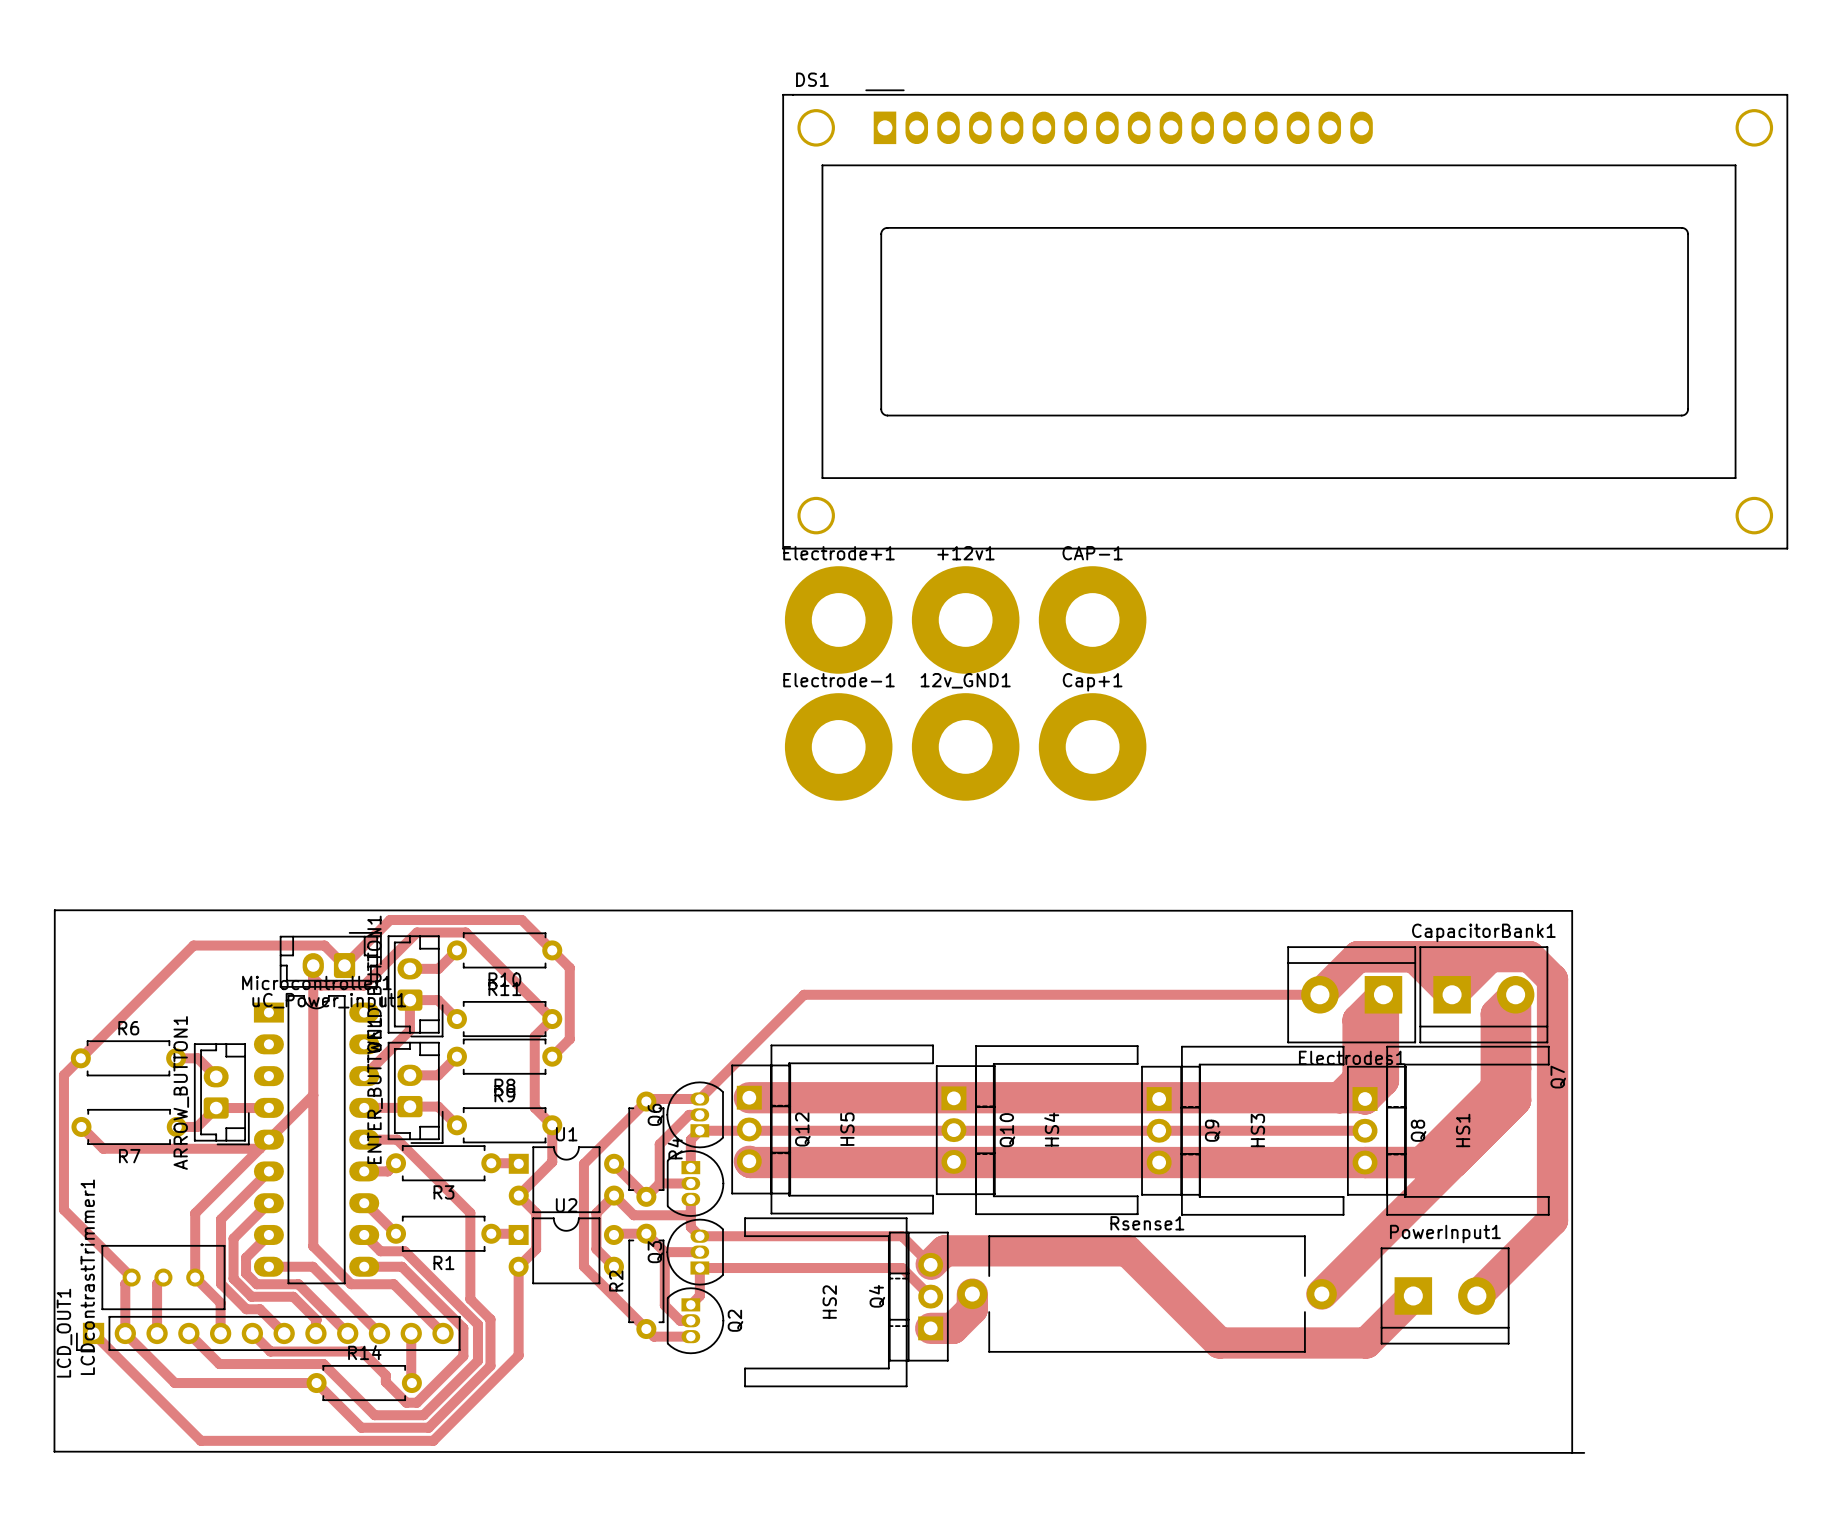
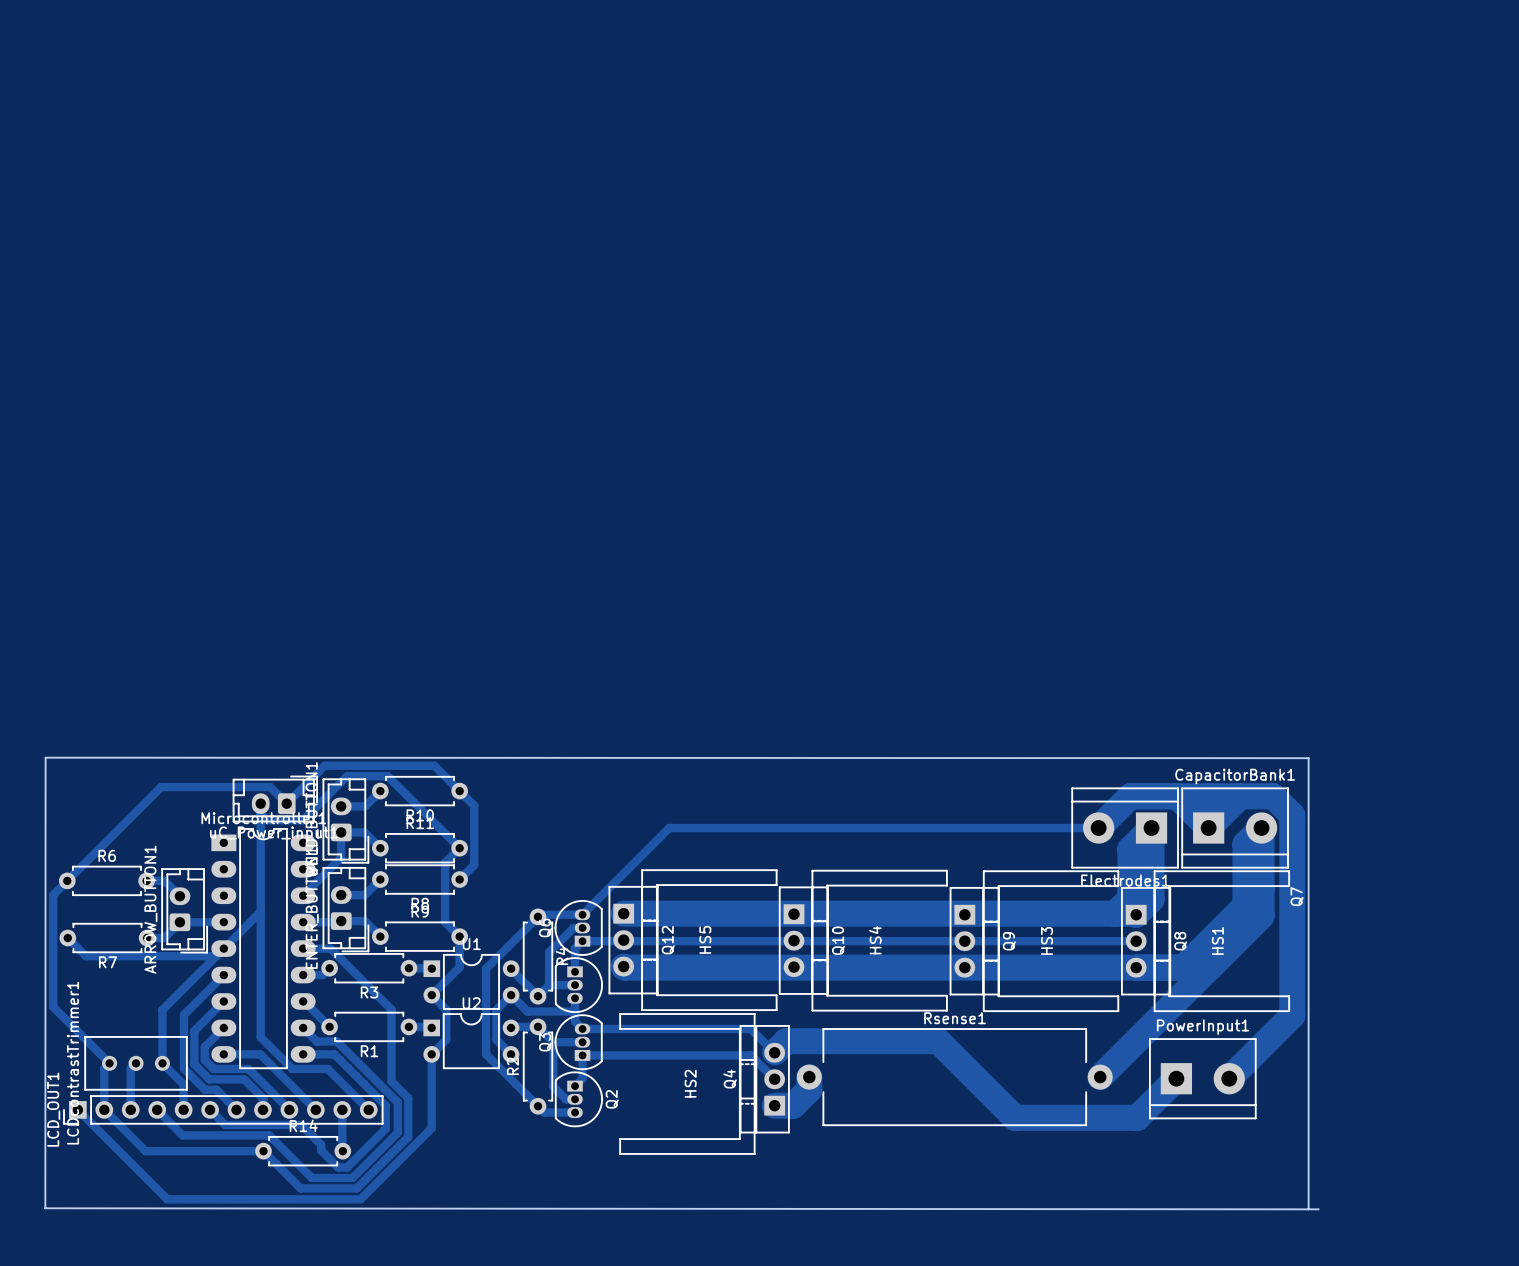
DS1: (1285, 319) -> none
Electrode+1: (838, 619) -> none
+12v1: (965, 619) -> none
CAP-1: (1092, 619) -> none
Electrode-1: (838, 746) -> none
12v_GND1: (965, 746) -> none
Cap+1: (1092, 746) -> none

